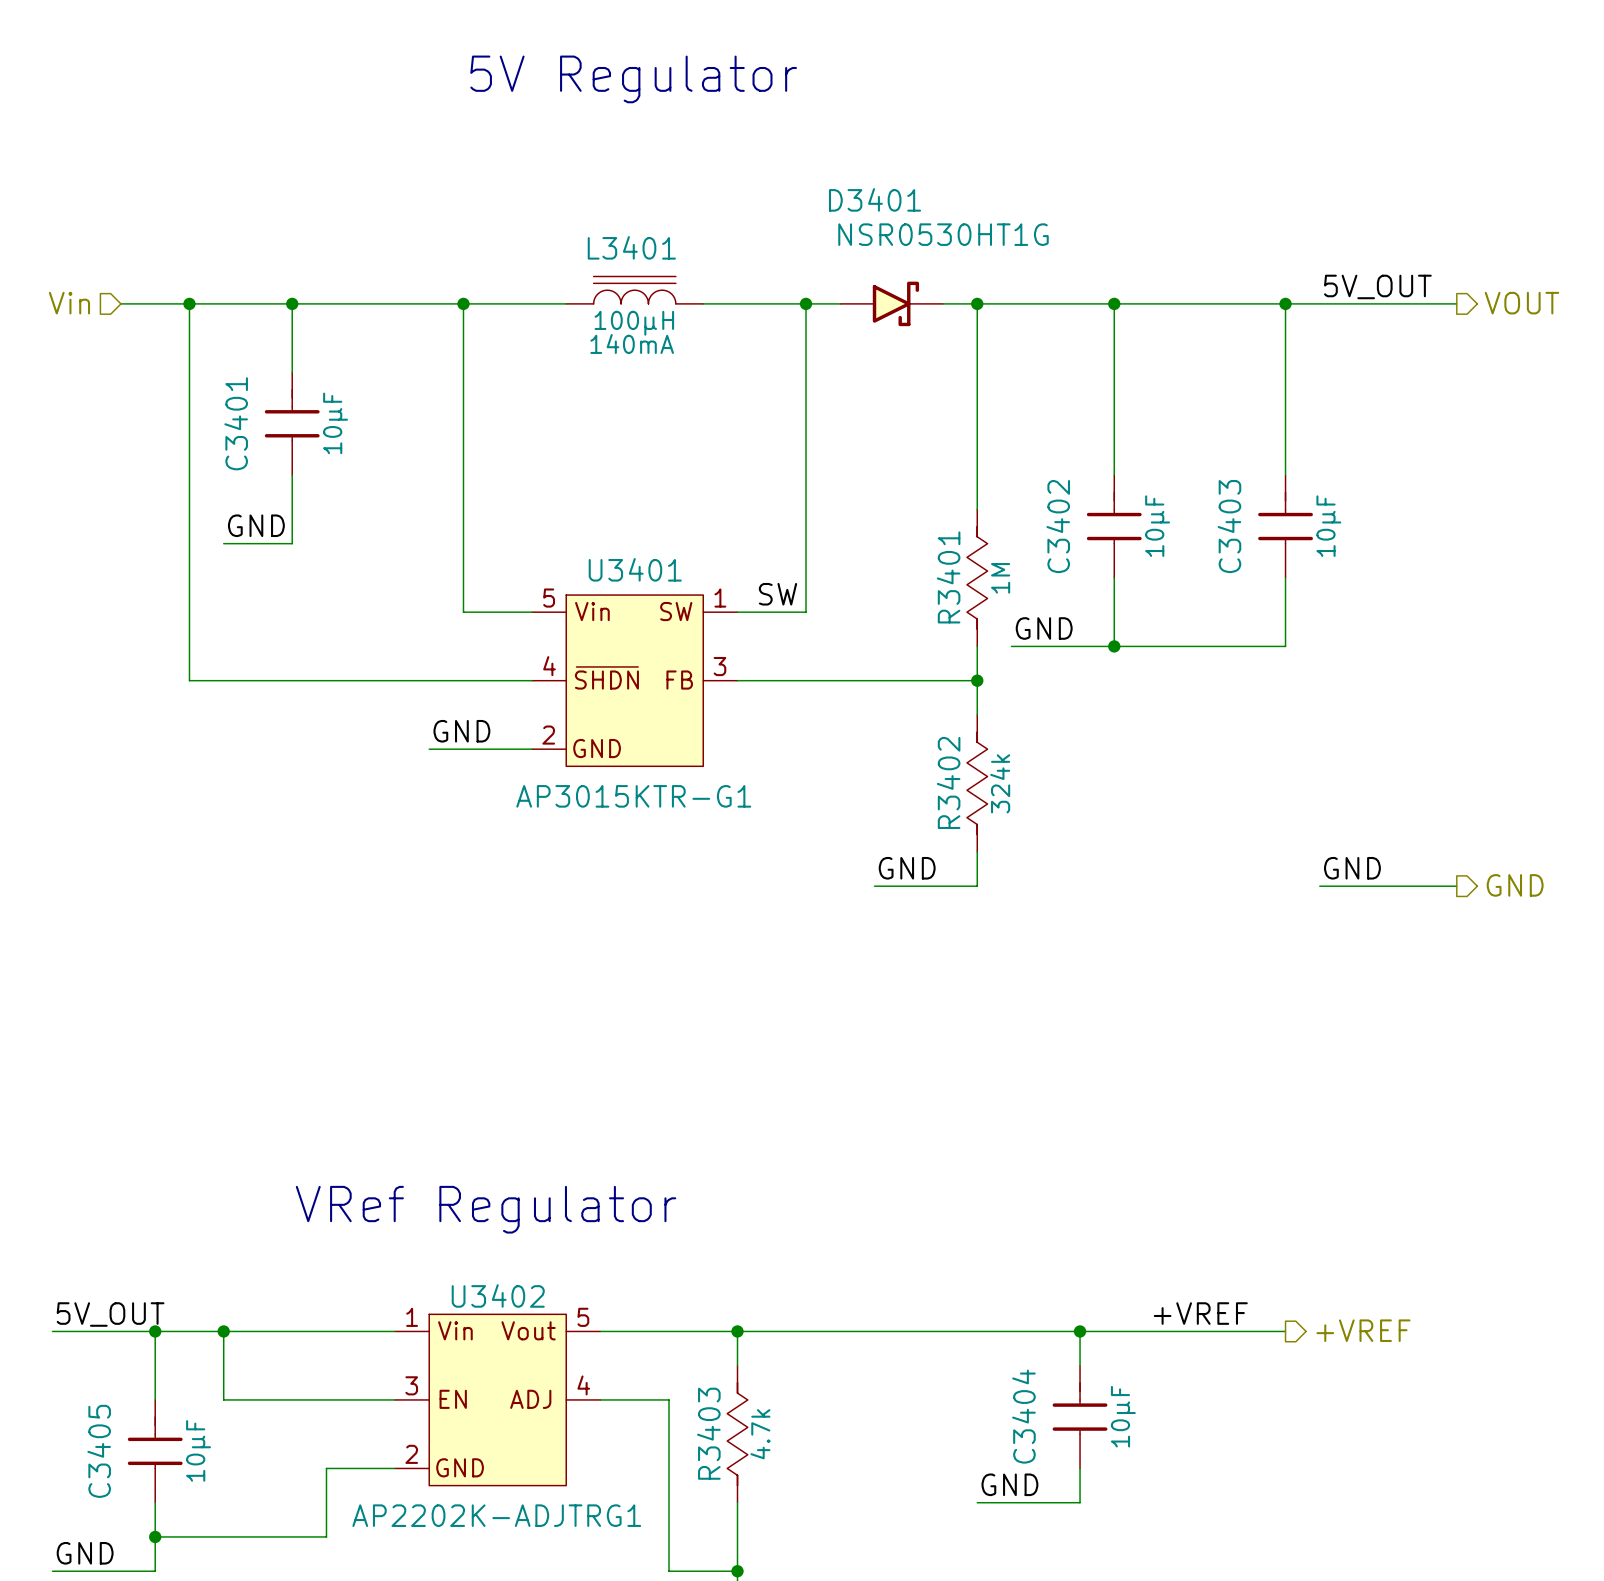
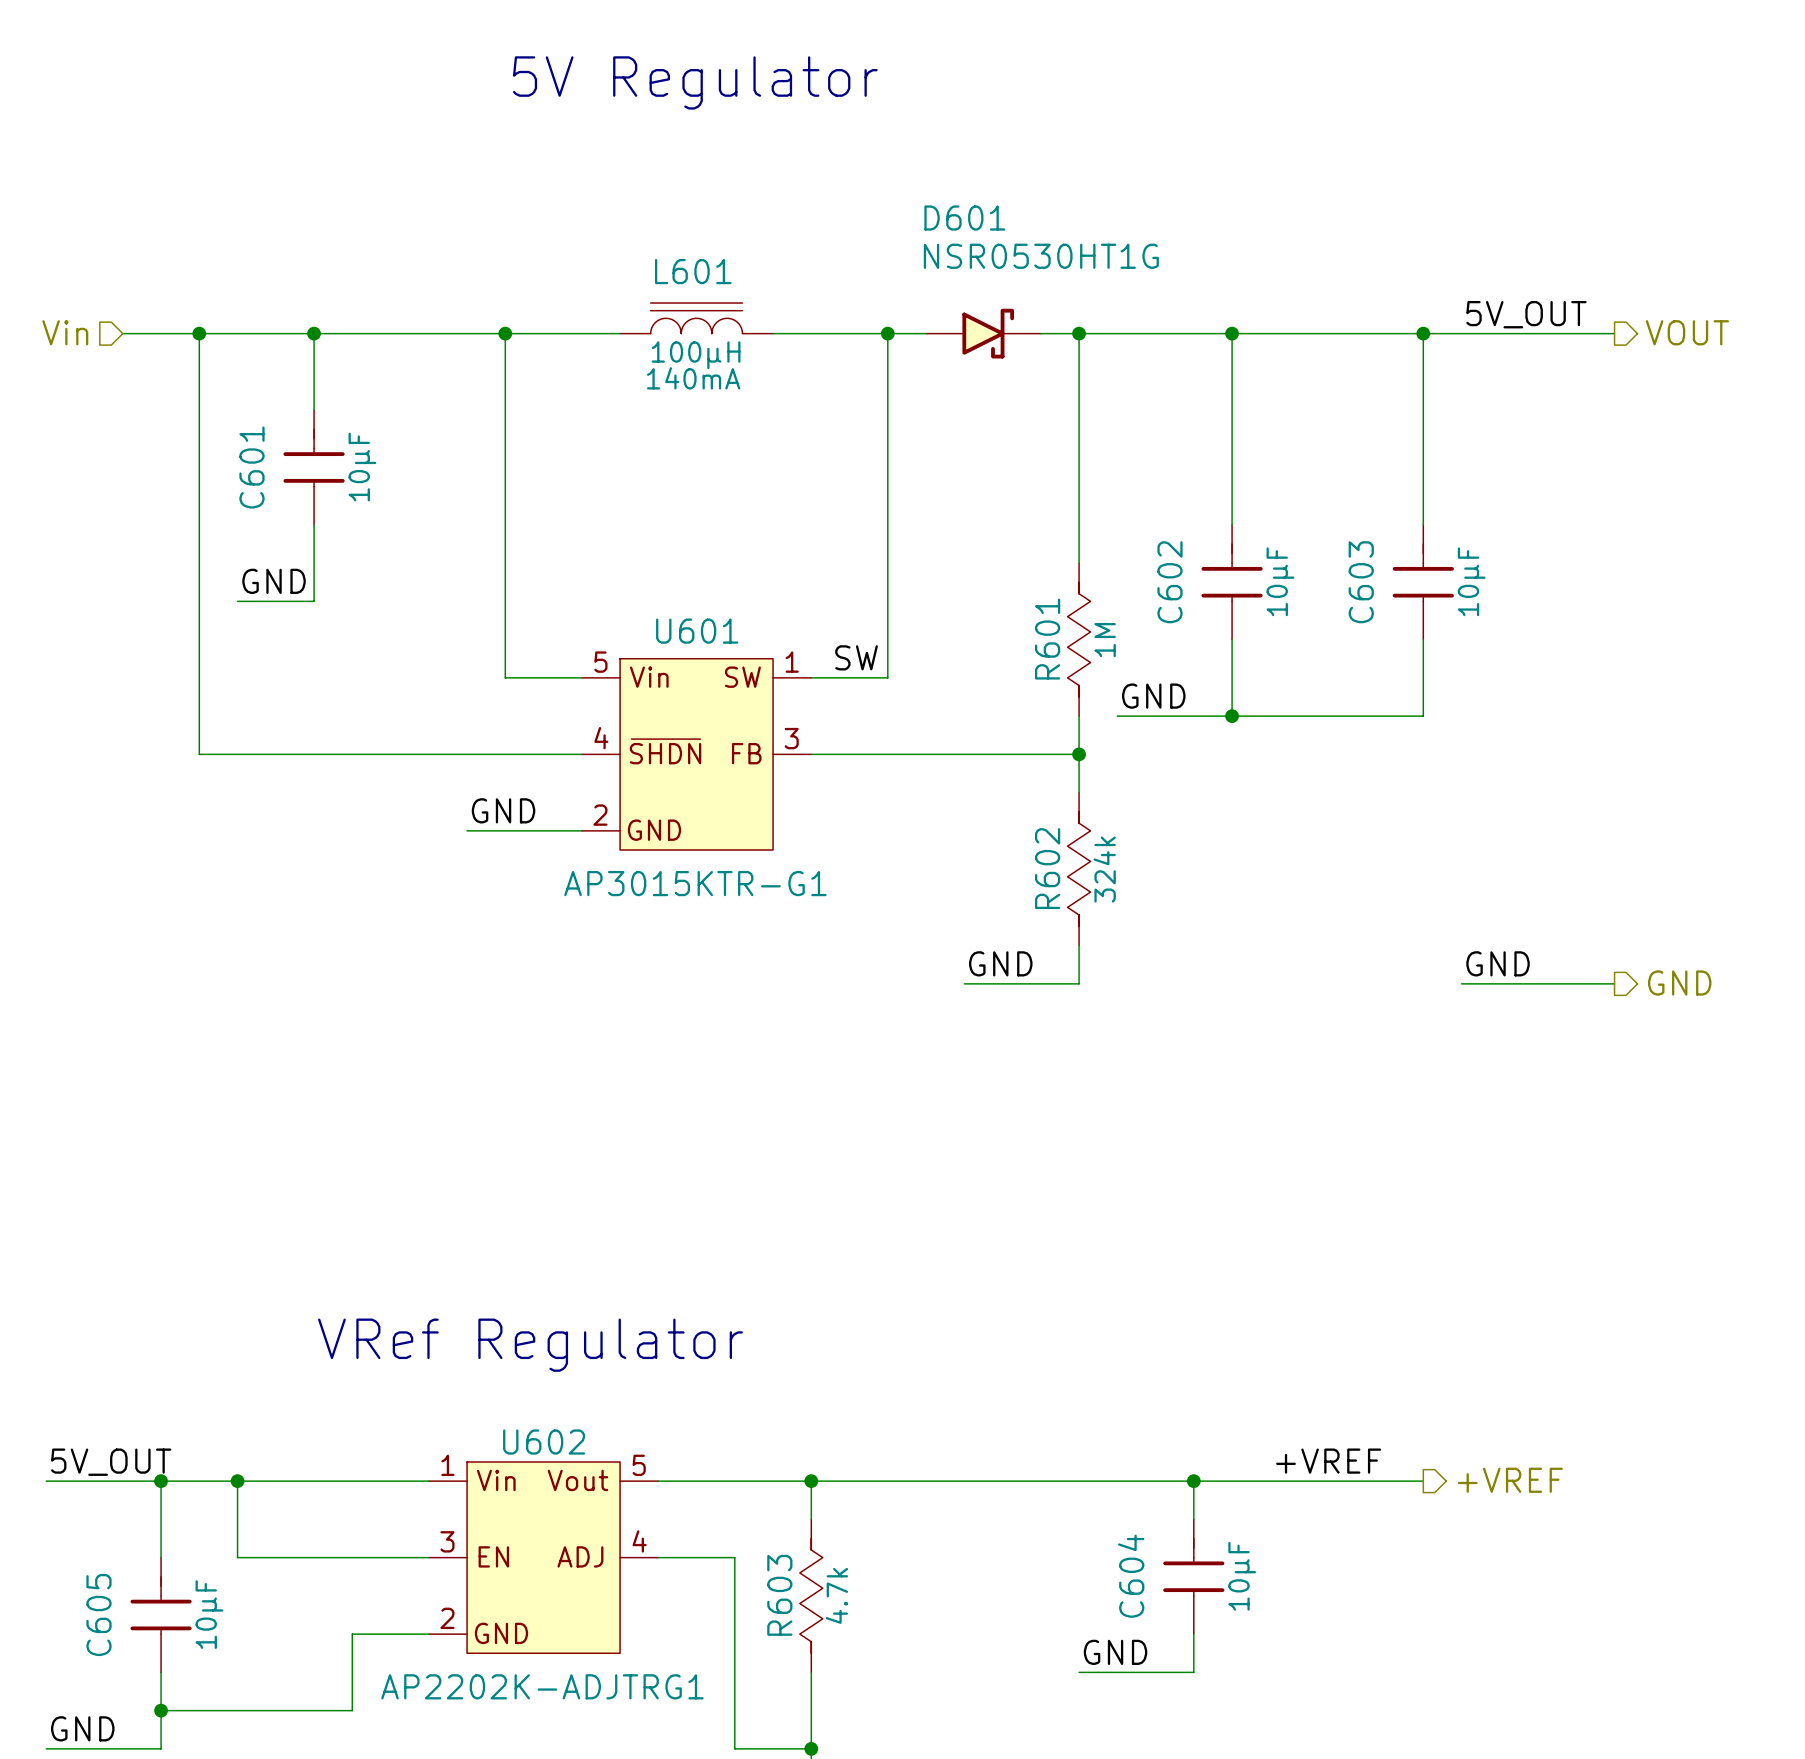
D3401 name: D3401 (875, 199) -> D601 (964, 218)
L3401 name: L3401 (631, 247) -> L601 (693, 271)
C3401 name: C3401 (236, 423) -> C601 (251, 467)
C3402 name: C3402 (1058, 526) -> C602 (1170, 582)
C3403 name: C3403 (1229, 526) -> C603 (1361, 582)
U3401 name: U3401 (635, 569) -> U601 (697, 631)
R3401 name: R3401 (948, 577) -> R601 (1047, 639)
R3402 name: R3402 (948, 782) -> R602 (1047, 868)
U3402 name: U3402 (498, 1295) -> U602 (544, 1442)
C3404 name: C3404 (1023, 1416) -> C604 (1131, 1576)
R3403 name: R3403 (708, 1433) -> R603 (779, 1595)
C3405 name: C3405 (99, 1451) -> C605 (98, 1615)

